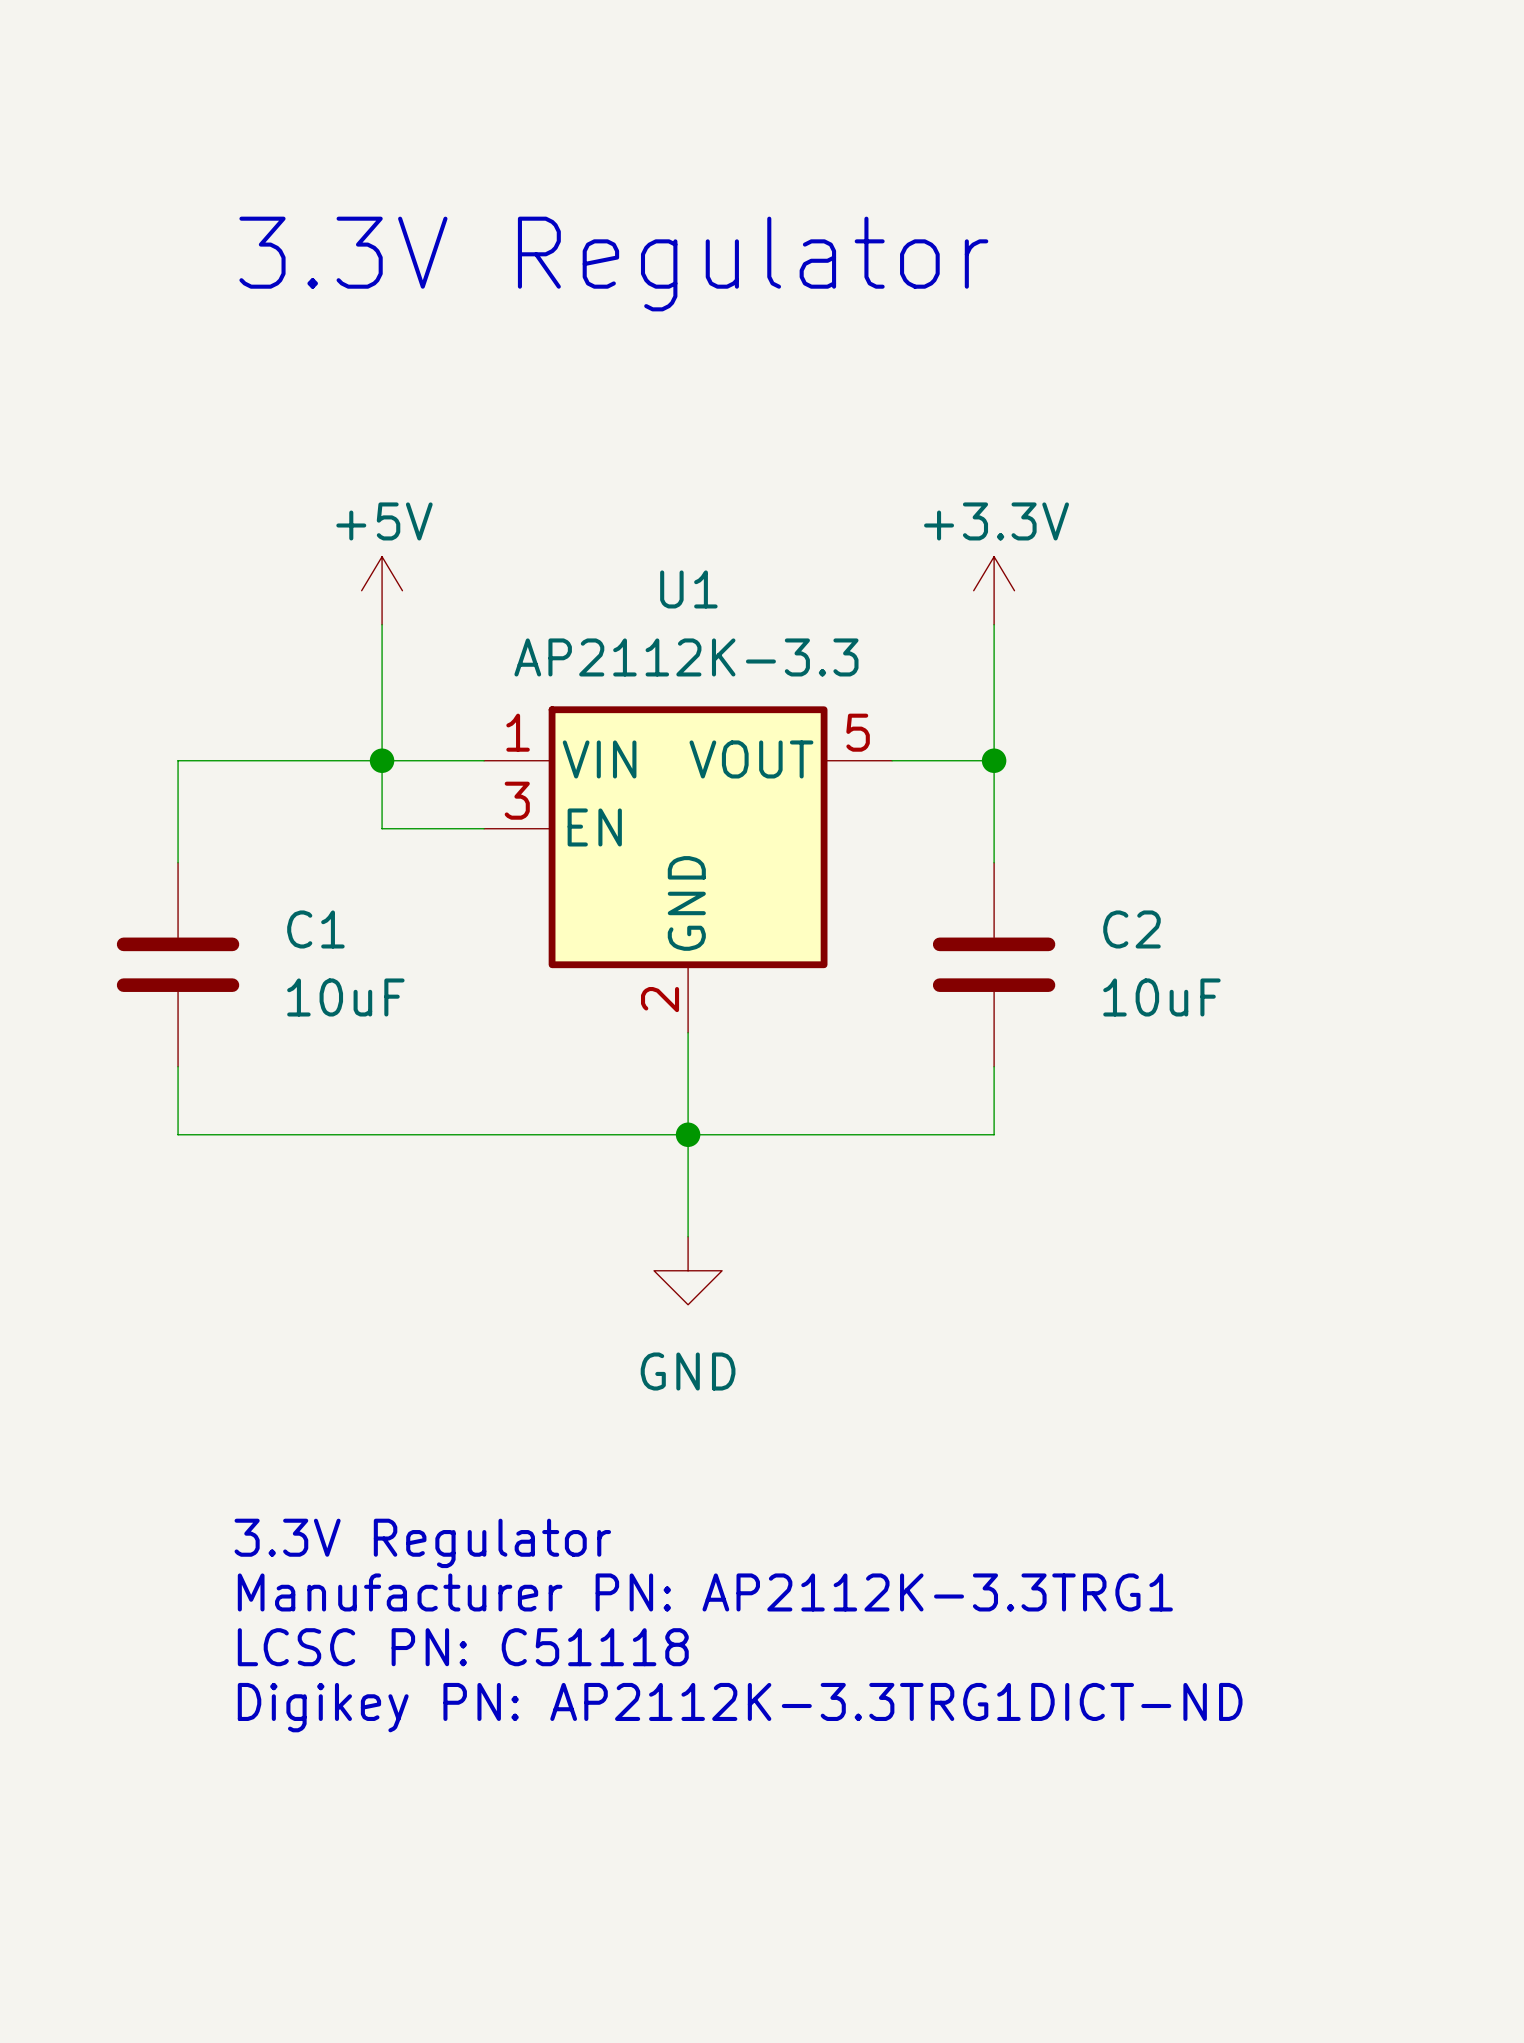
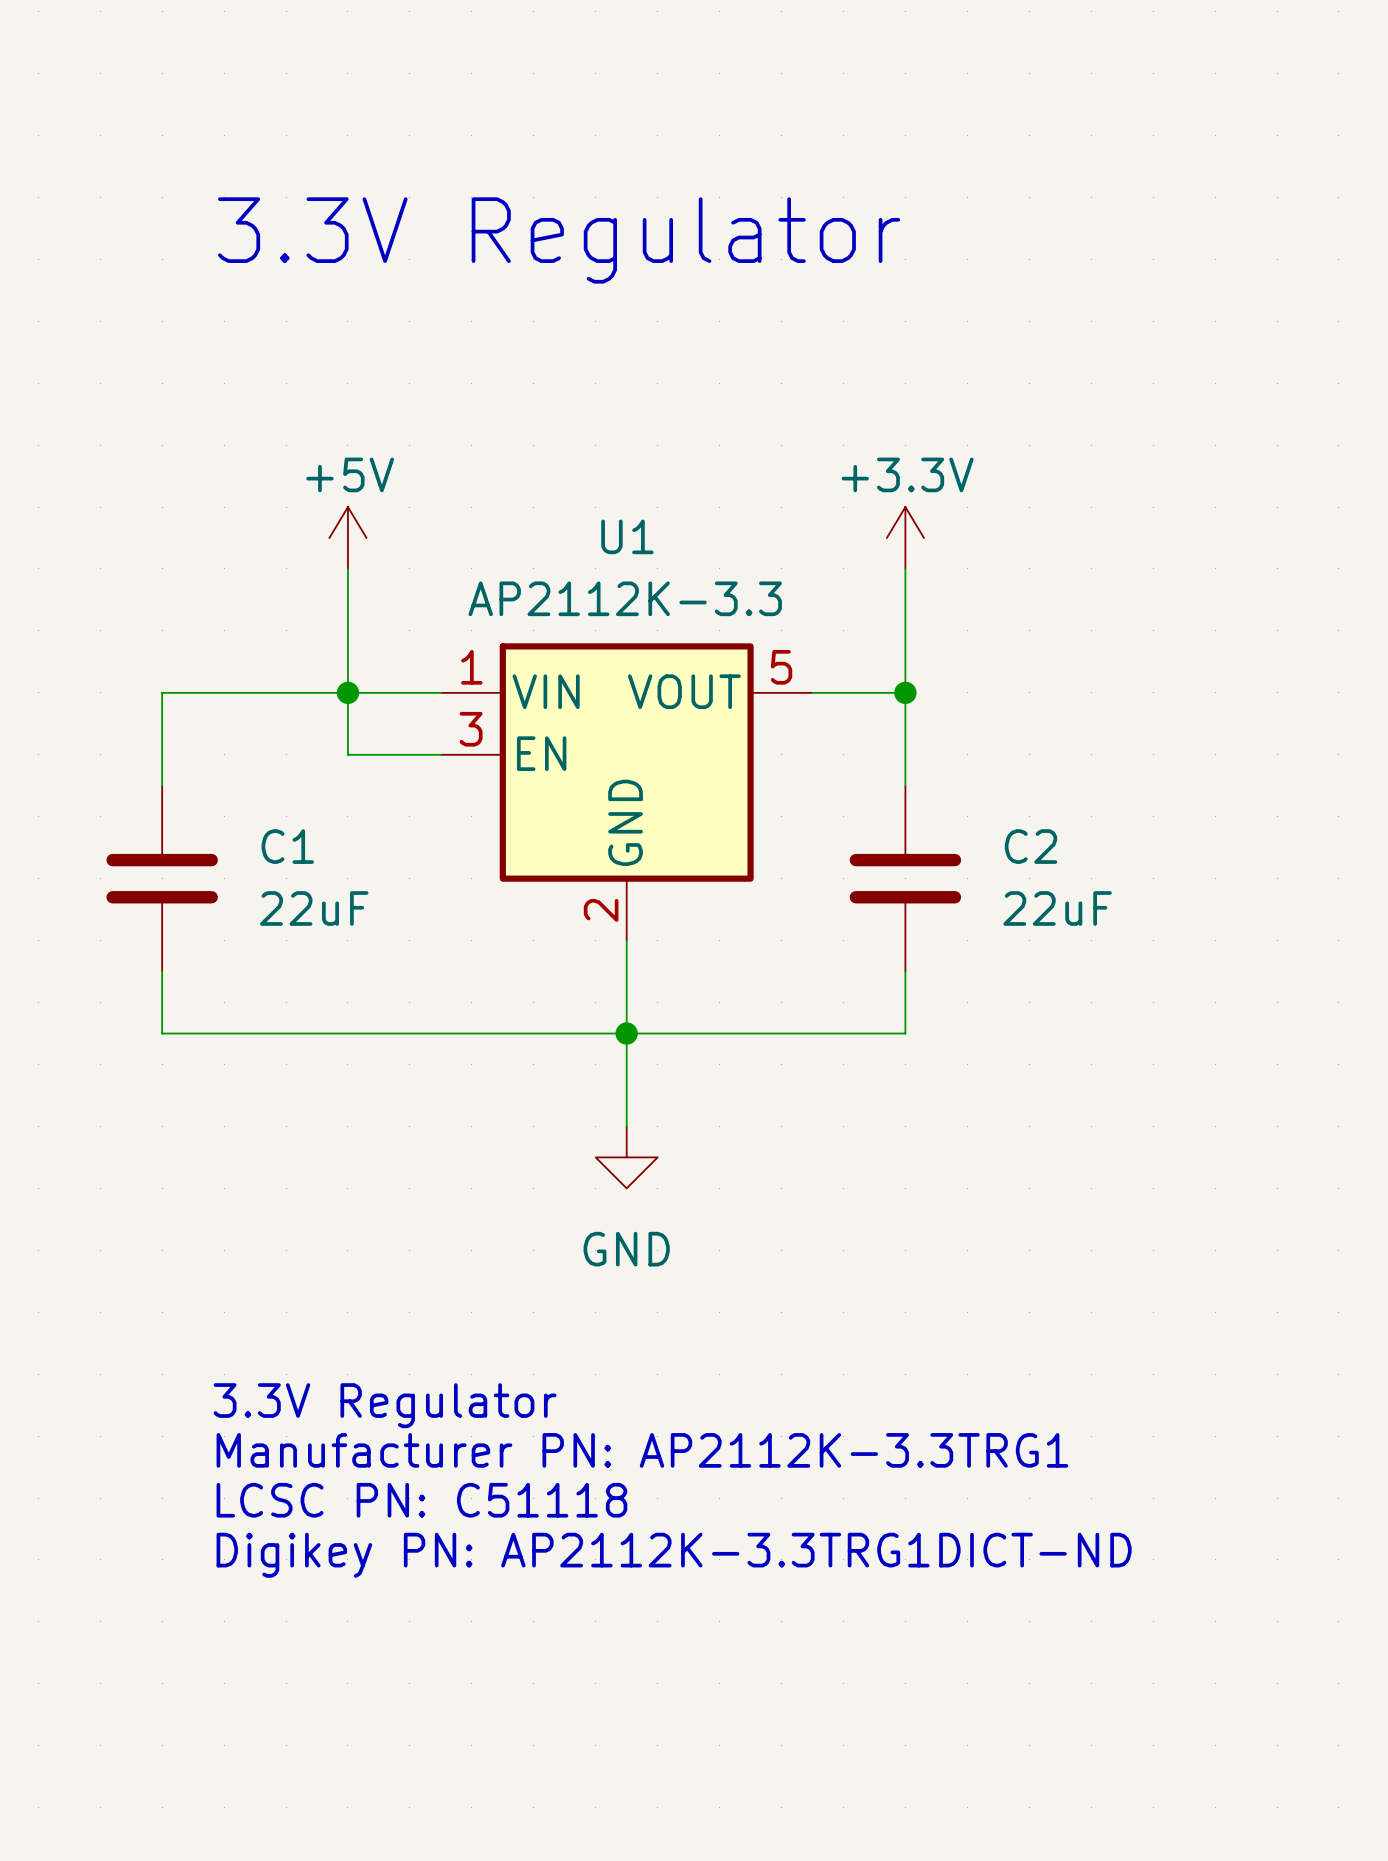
C1 value: 10uF (345, 997) -> 22uF (314, 908)
C2 value: 10uF (1161, 997) -> 22uF (1057, 908)

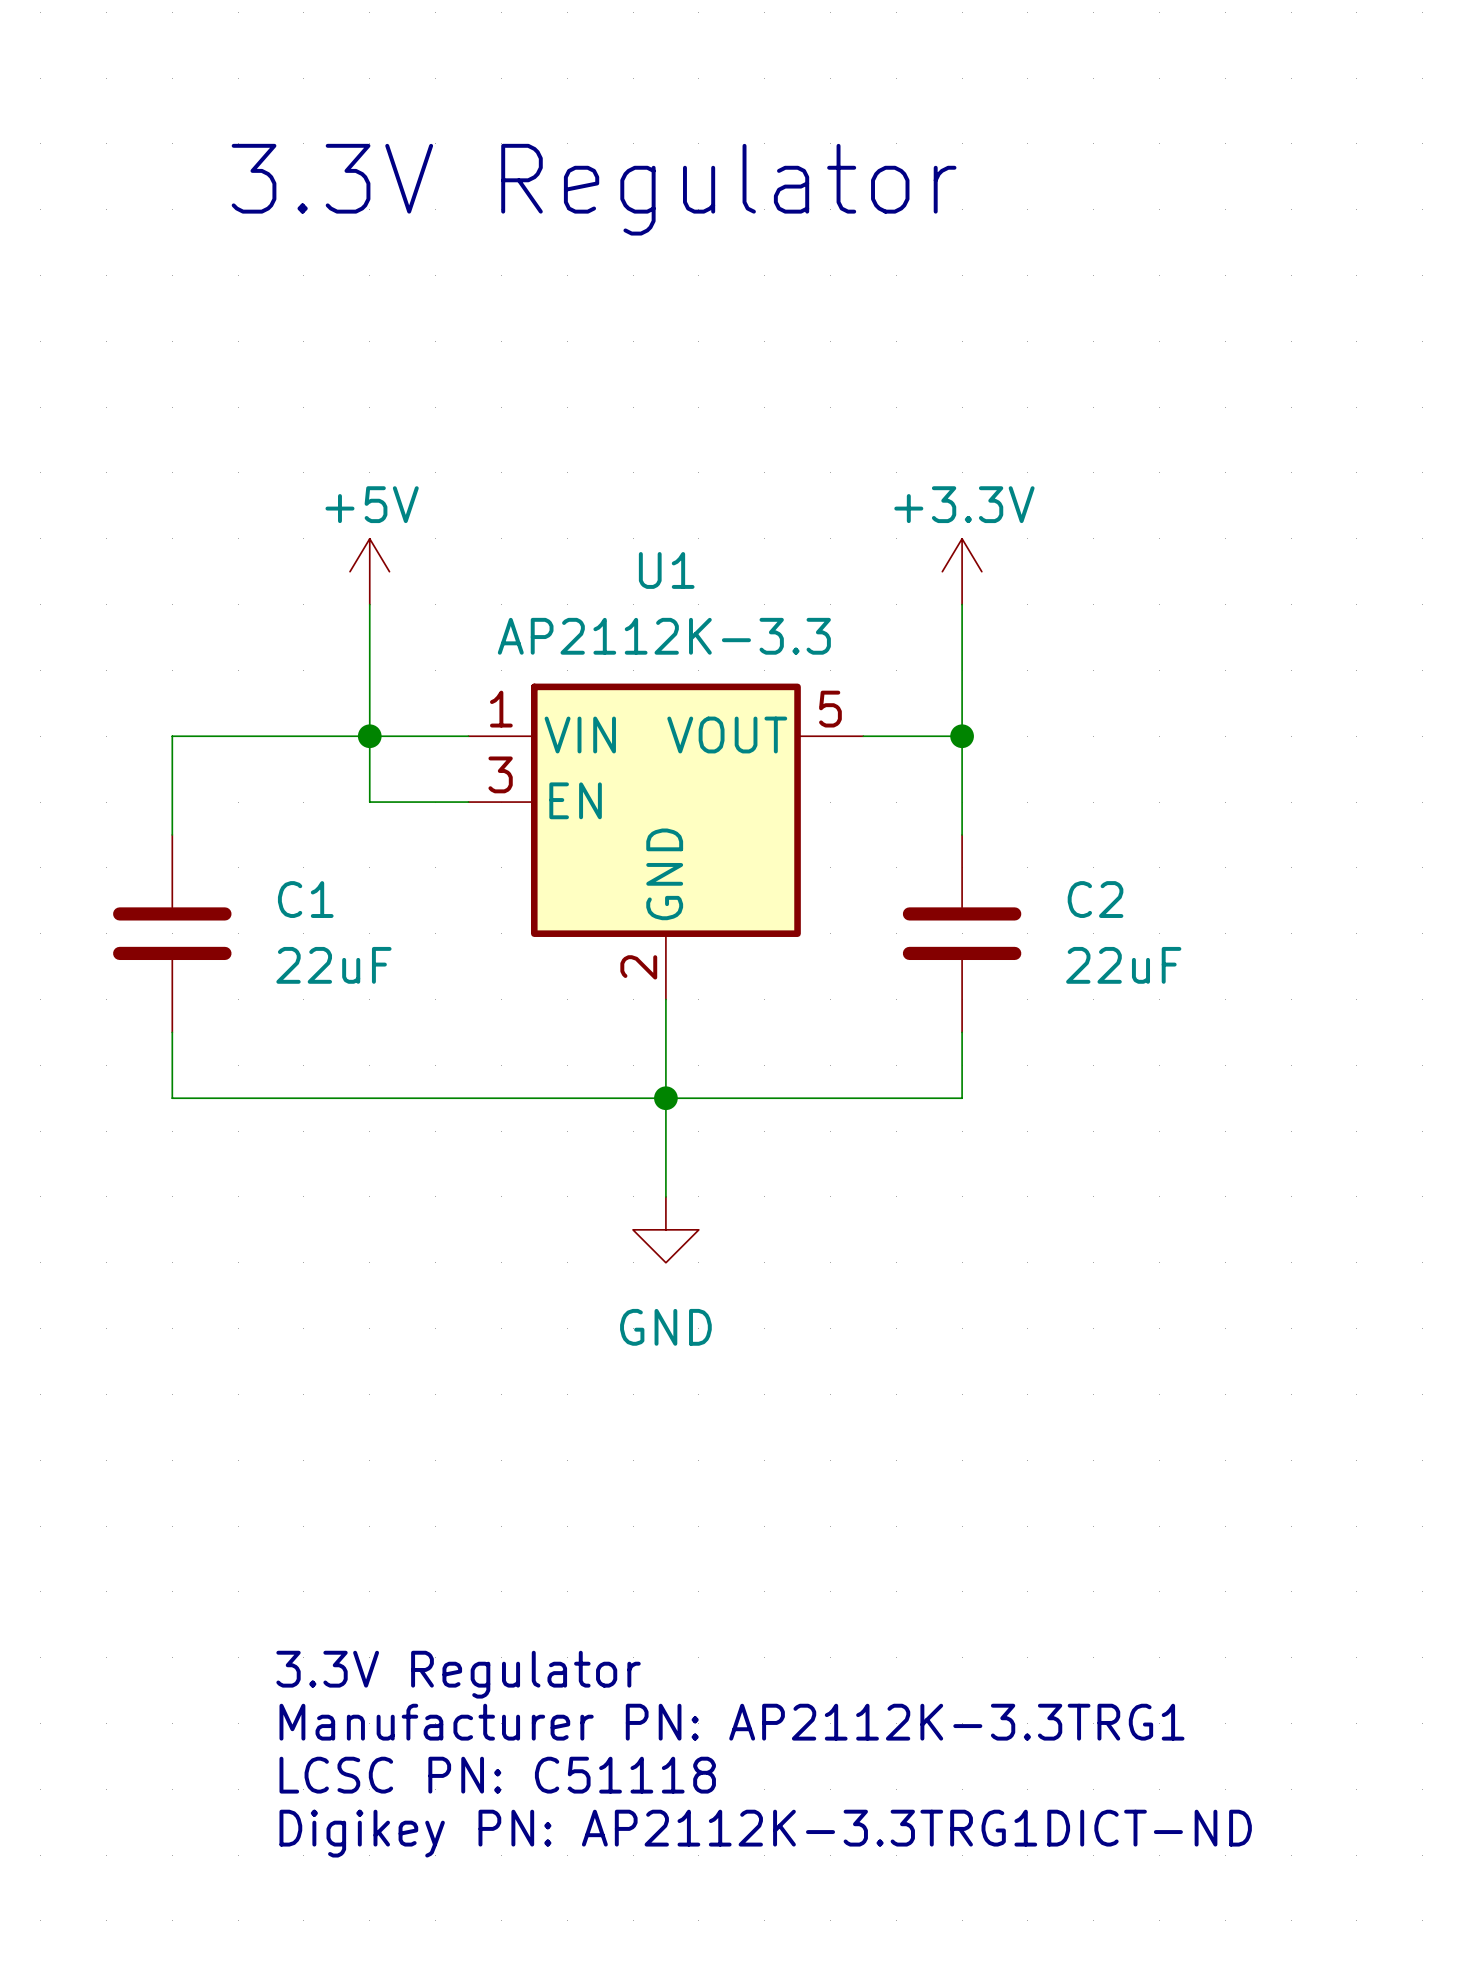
text position: 3.3V Regulator (559, 240) -> 3.3V Regulator (594, 189)
text position: 3.3V Regulator (385, 1405) -> 3.3V Regulator (458, 1674)
text position: Manufacturer PN: AP2112K-3.3TRG1 (642, 1450) -> Manufacturer PN: AP2112K-3.3TRG1 (731, 1722)
text position: LCSC PN: C51118 (421, 1500) -> LCSC PN: C51118 (497, 1775)
text position: Digikey PN: AP2112K-3.3TRG1DICT-ND (674, 1555) -> Digikey PN: AP2112K-3.3TRG1DICT-ND (765, 1833)

